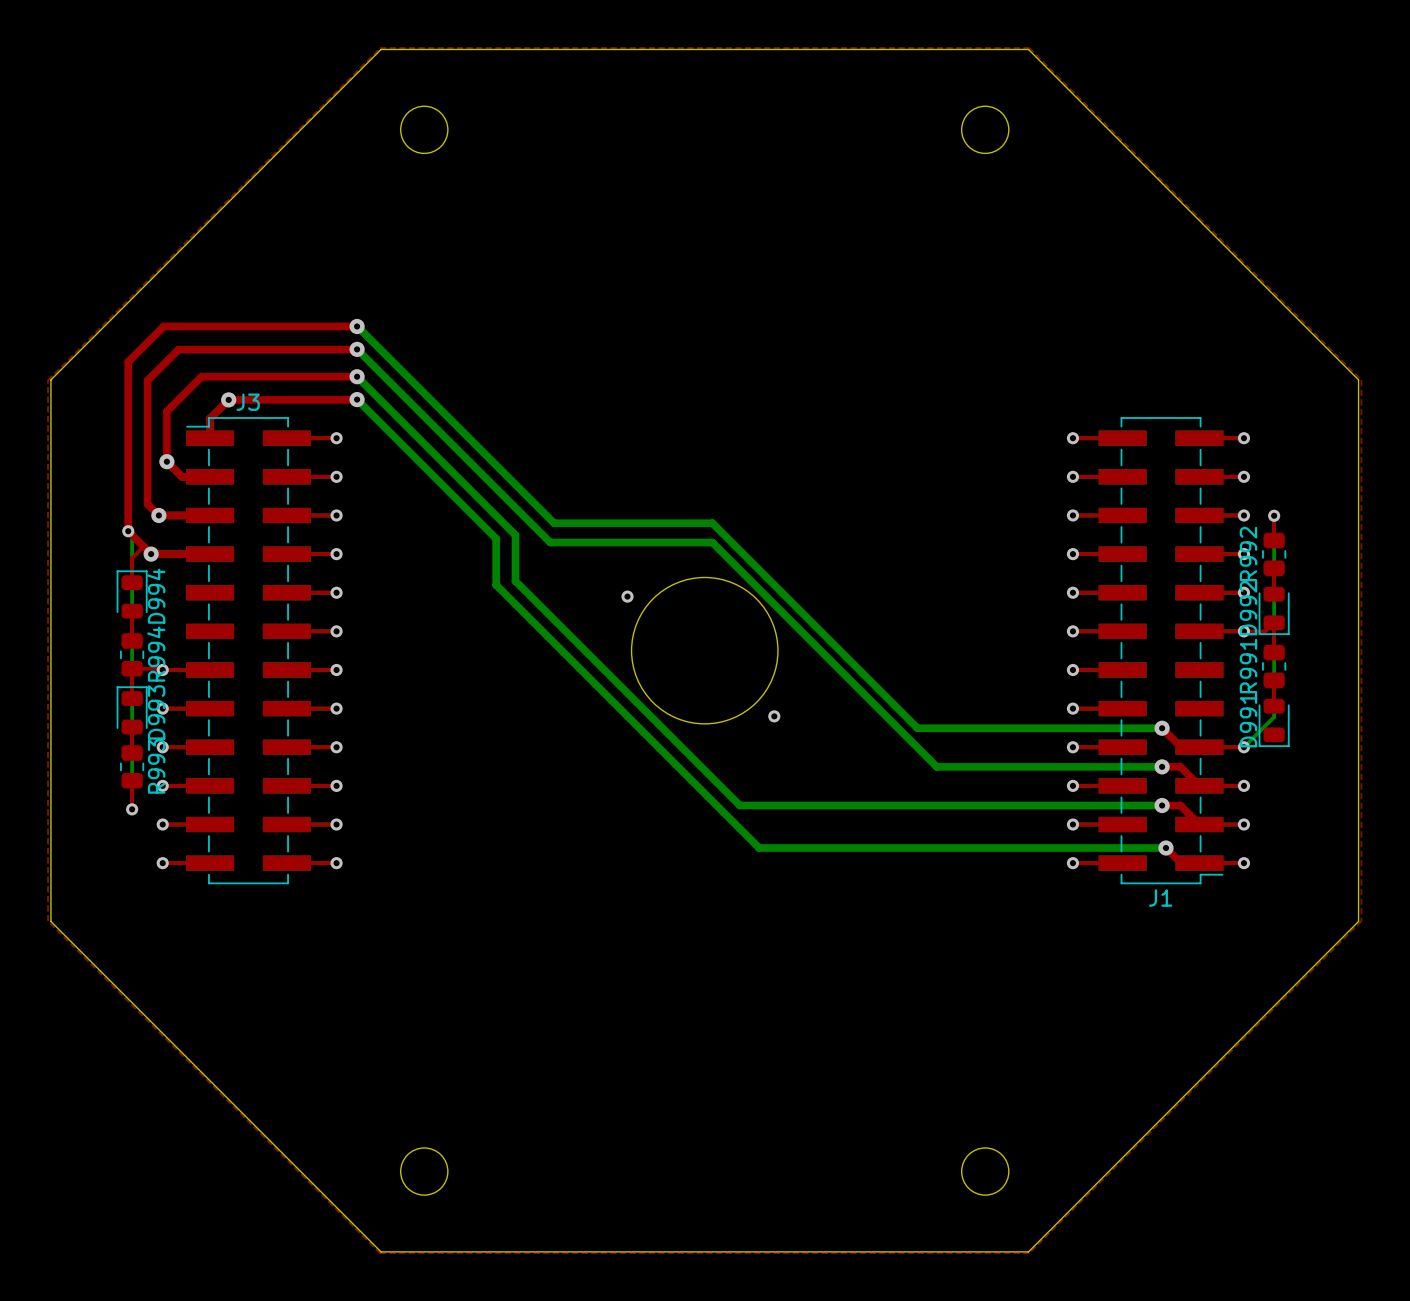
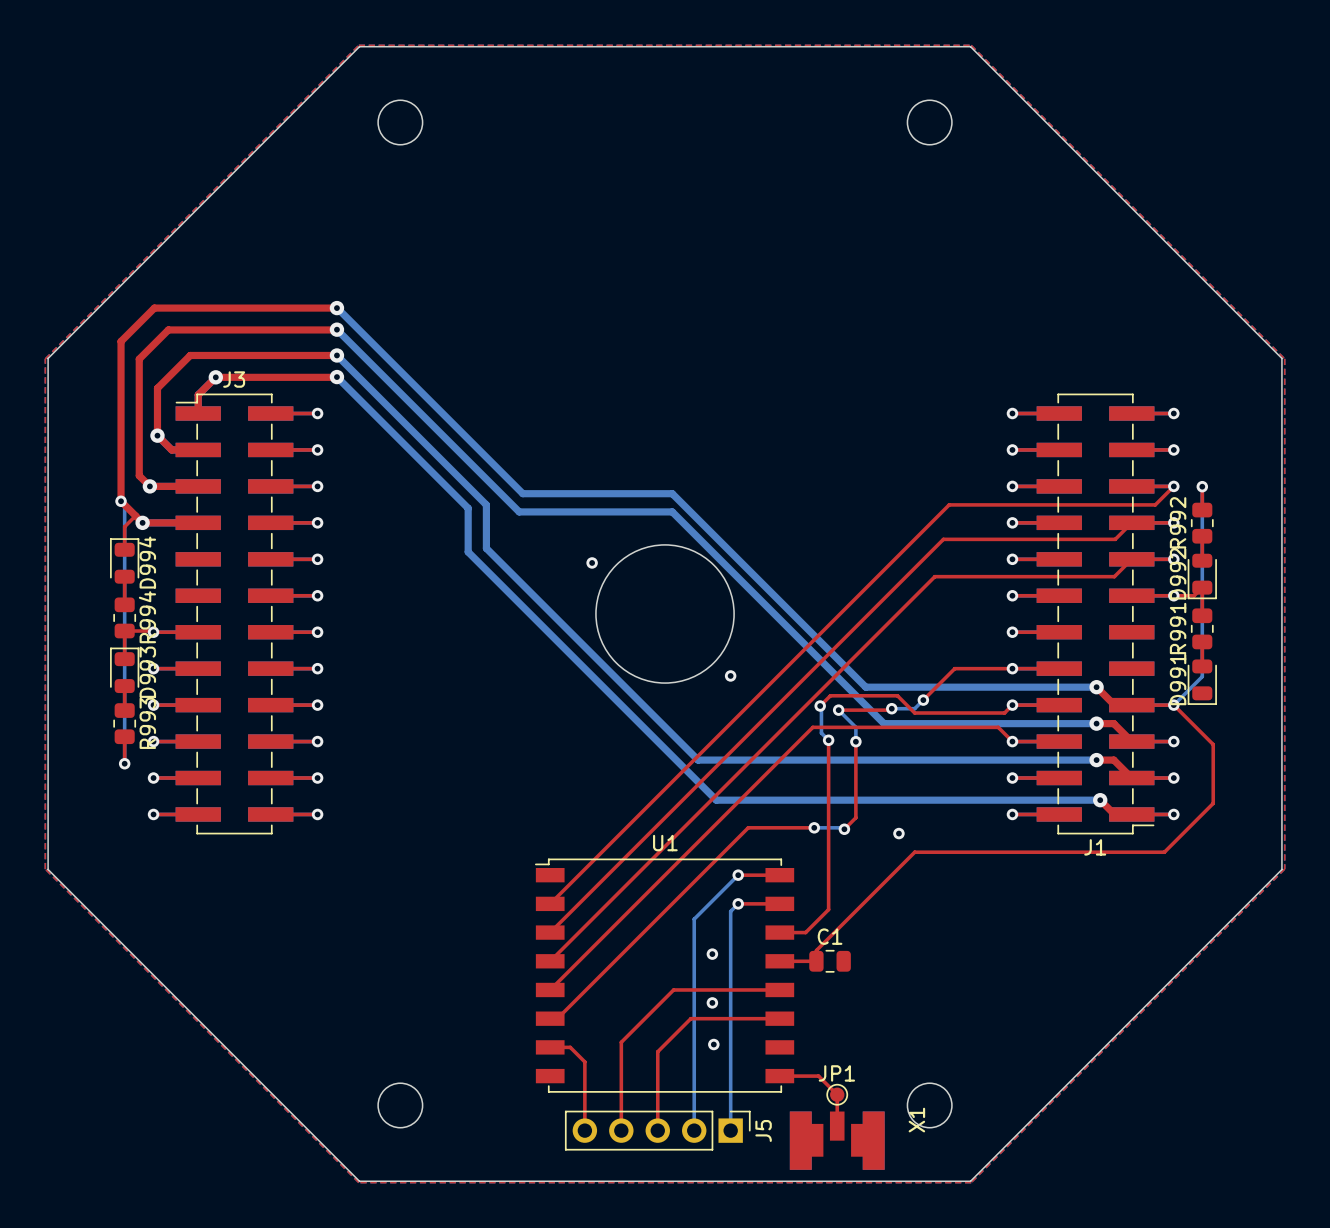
top track: none -> (1173, 486) (1155, 504) (949, 504) (550, 903)
top track: none -> (1131, 522) (1115, 539) (943, 539) (550, 932)
top track: none -> (1131, 559) (1114, 576) (934, 576) (550, 961)
top track: none -> (1012, 668) (954, 668) (923, 700)
bottom track: none -> (923, 700) (914, 708) (891, 708)
via: none -> (923, 700)
top track: none -> (1012, 705) (1004, 713) (914, 713) (897, 695) (830, 695) (820, 706)
top track: none -> (1173, 705) (1213, 744) (1213, 803) (1164, 852) (914, 852) (816, 950) (816, 961) (779, 961)
bottom track: none -> (820, 706) (821, 733) (828, 740)
via: none -> (820, 706)
top track: none -> (891, 708) (838, 710)
via: none -> (891, 708)
bottom track: none -> (838, 710) (855, 727) (855, 741)
via: none -> (838, 710)
top track: none -> (828, 740) (828, 909) (805, 932) (779, 932)
via: none -> (828, 740)
top track: none -> (1012, 741) (998, 727) (812, 727) (550, 989)
top track: none -> (855, 741) (855, 817) (844, 829)
via: none -> (855, 741)
top track: none -> (814, 827) (748, 827) (557, 1018) (550, 1018)
bottom track: none -> (814, 827) (844, 829)
via: none -> (814, 827)
via: none -> (844, 829)
via: none -> (898, 833)
top track: none -> (738, 875) (779, 875)
bottom track: none -> (738, 875) (694, 919) (694, 1130)
via: none -> (738, 875)
top track: none -> (738, 903) (779, 903)
bottom track: none -> (738, 903) (730, 911) (730, 1130)
via: none -> (738, 903)
via: none -> (712, 954)
C1: none -> (830, 961)
U1: none -> (664, 975)
top track: none -> (779, 989) (673, 989) (621, 1042) (621, 1130)
via: none -> (712, 1002)
top track: none -> (779, 1018) (690, 1018) (657, 1051) (657, 1130)
via: none -> (713, 1044)
top track: none -> (550, 1047) (570, 1047) (584, 1061) (584, 1130)
top track: none -> (779, 1076) (818, 1076) (837, 1094) (837, 1126)
JP1: none -> (837, 1094)
J5: none -> (657, 1130)
X1: none -> (837, 1140)

